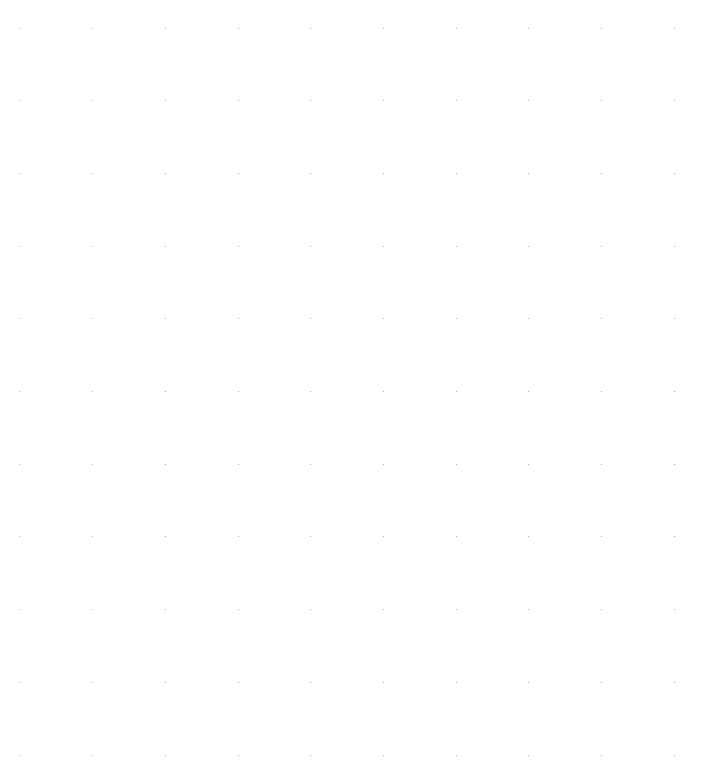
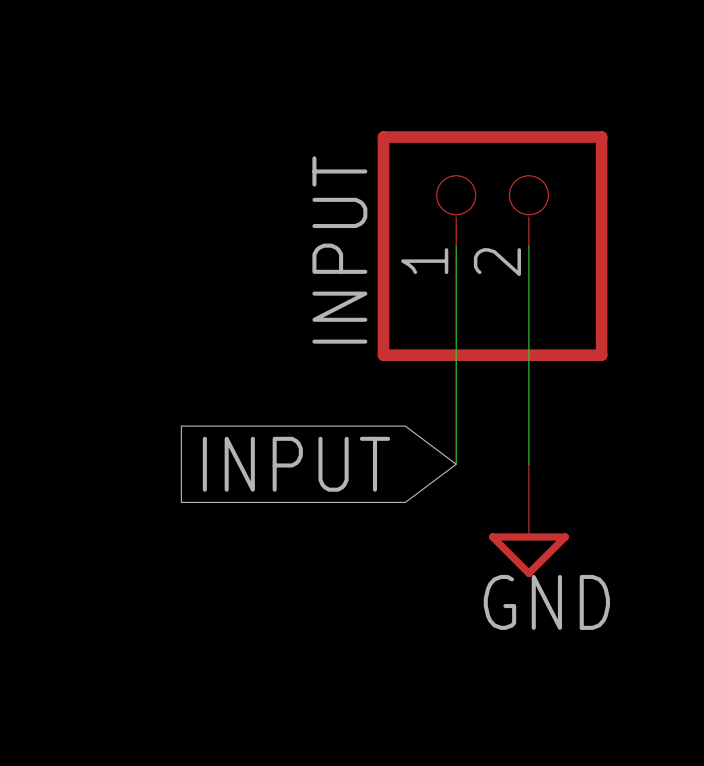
wire: none -> (456, 246) (456, 464)
INPUT: none -> (492, 246)
wire: none -> (528, 246) (528, 464)
global label: none -> INPUT (296, 464)
power symbol: none -> GND (528, 520)

